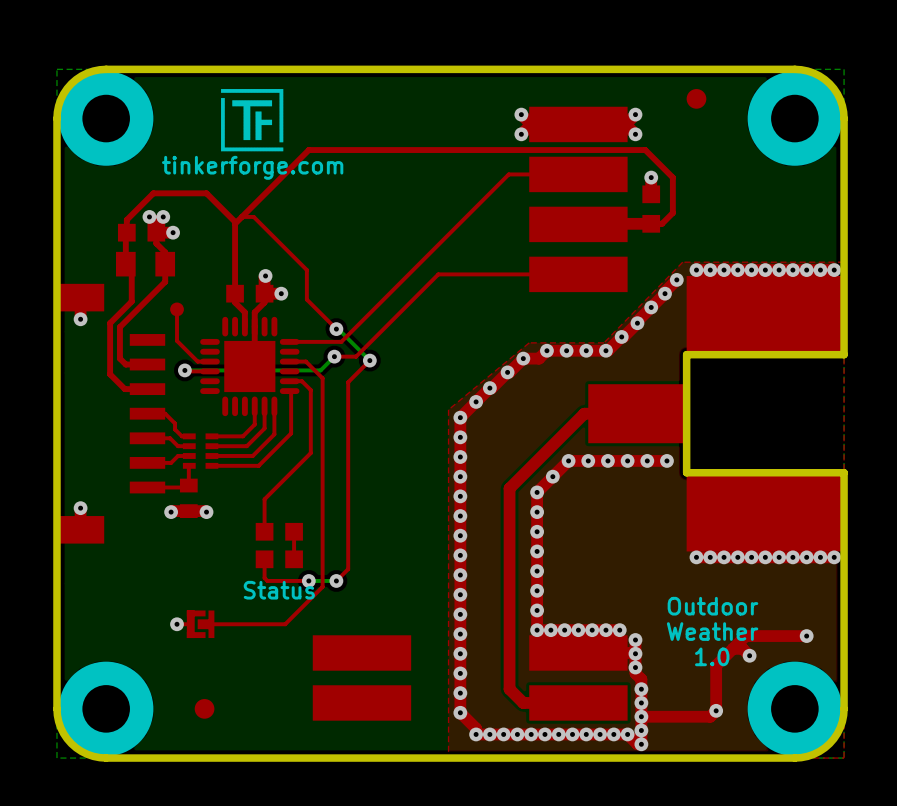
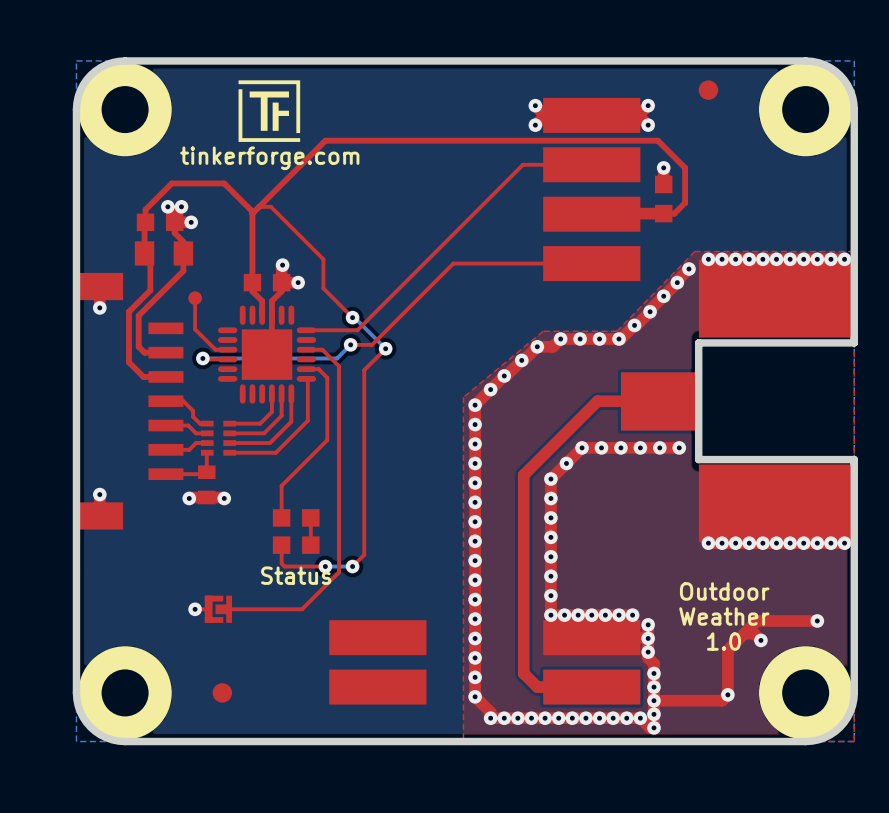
part footprint: [588, 275, 845, 552] -> [620, 259, 855, 543]

